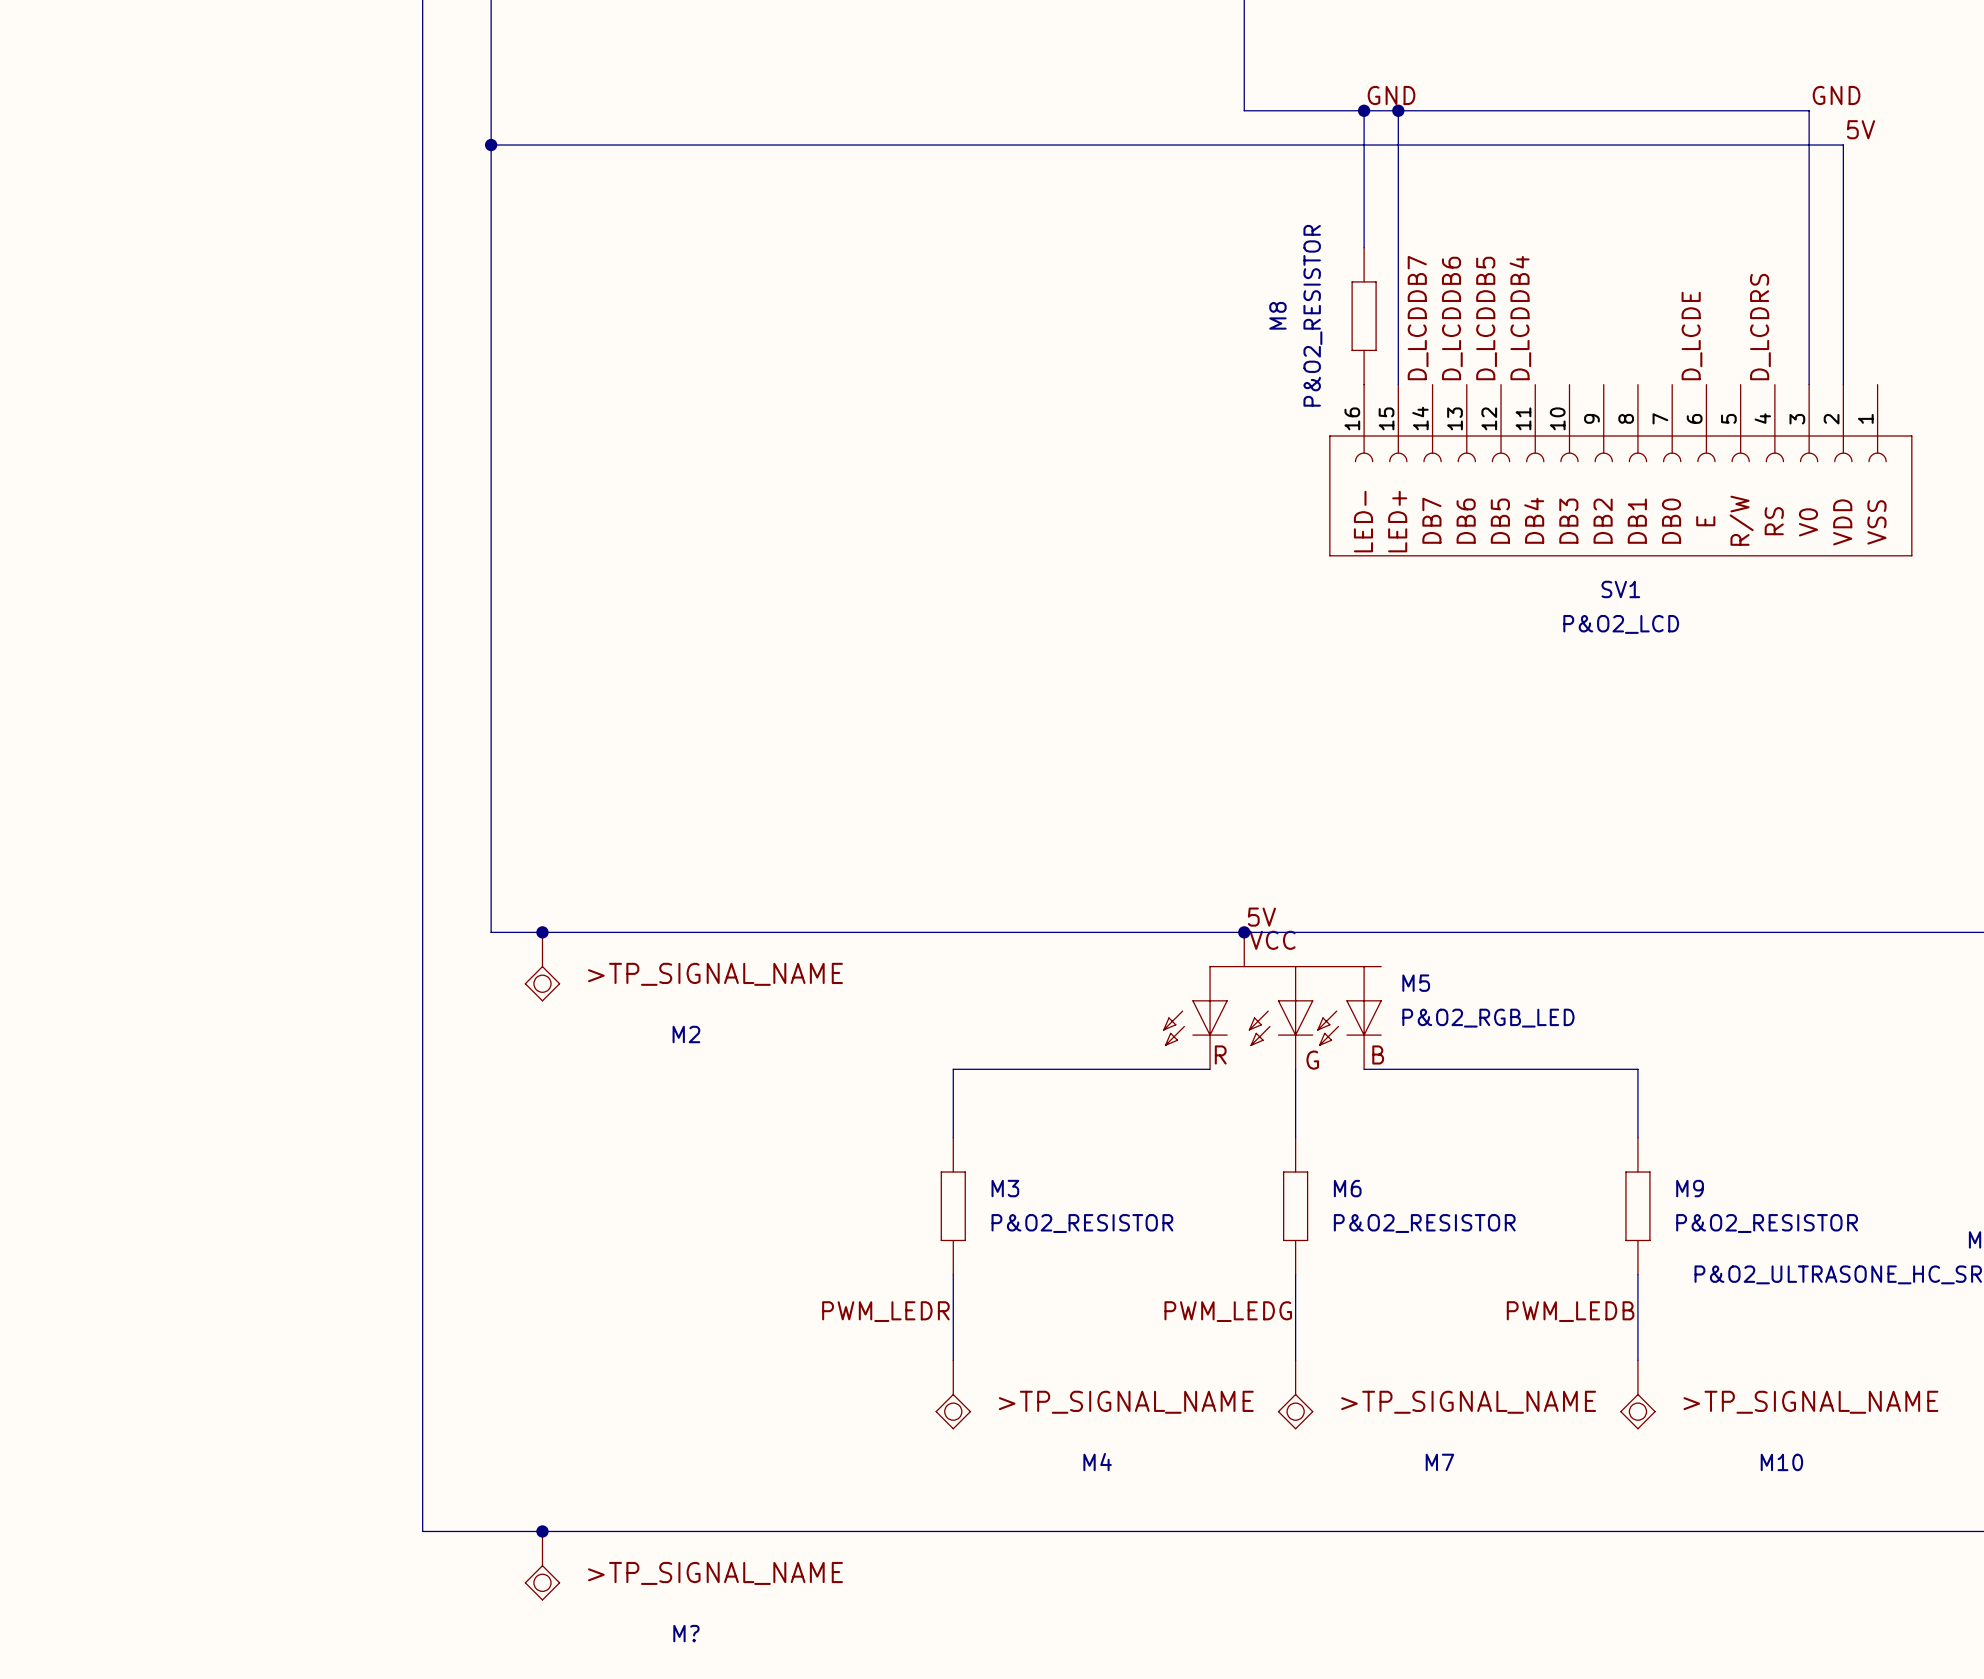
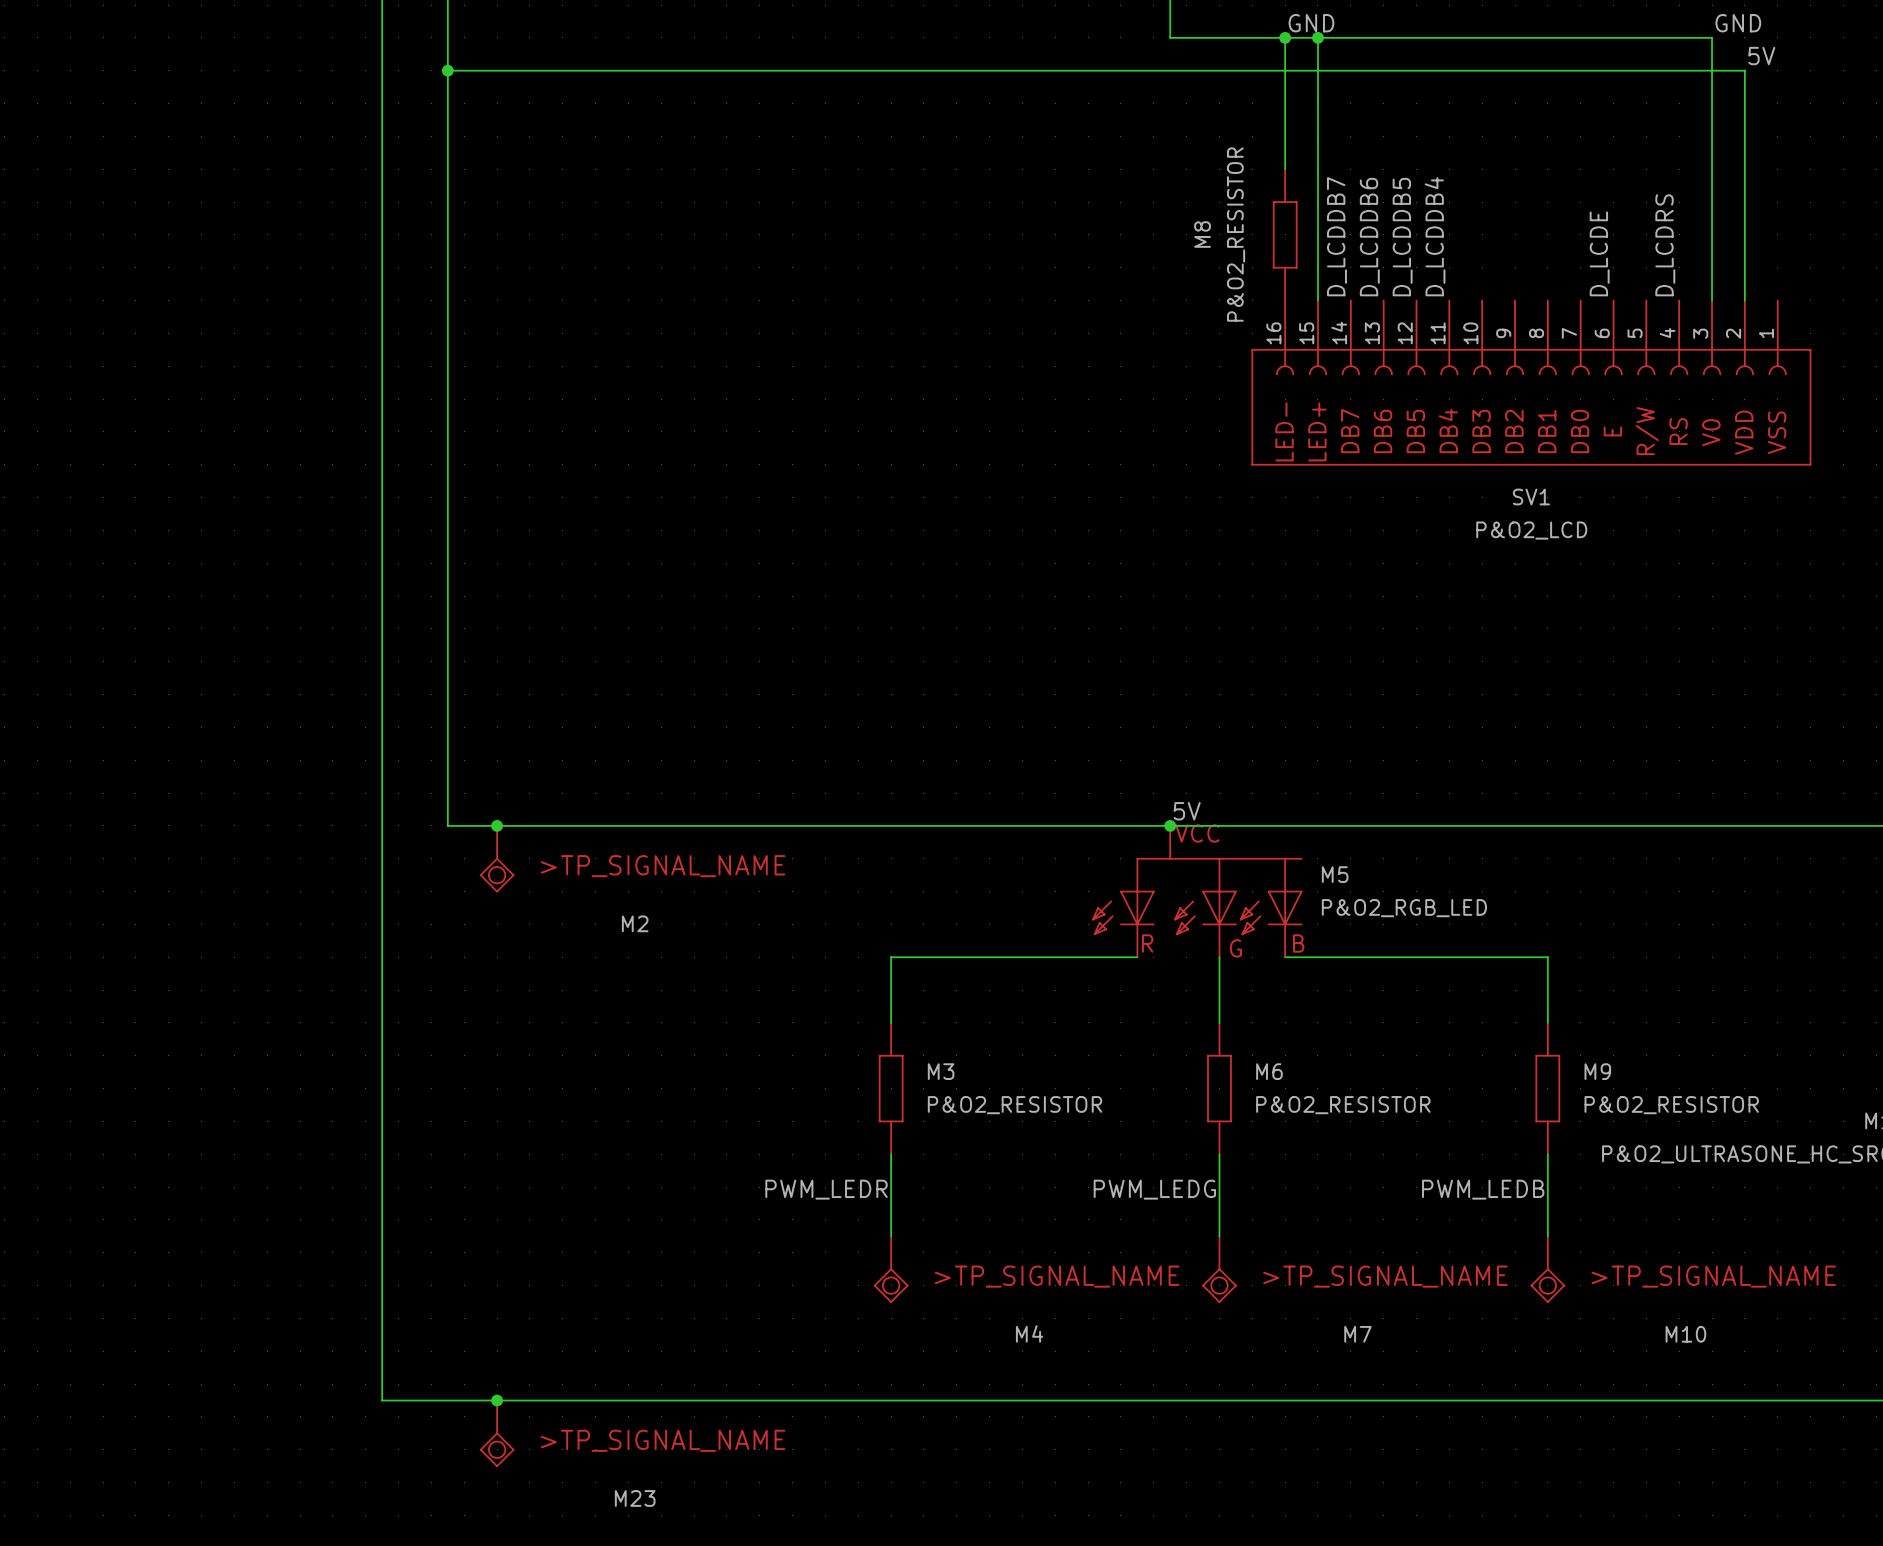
M? name: M? (686, 1633) -> M23 (635, 1498)

